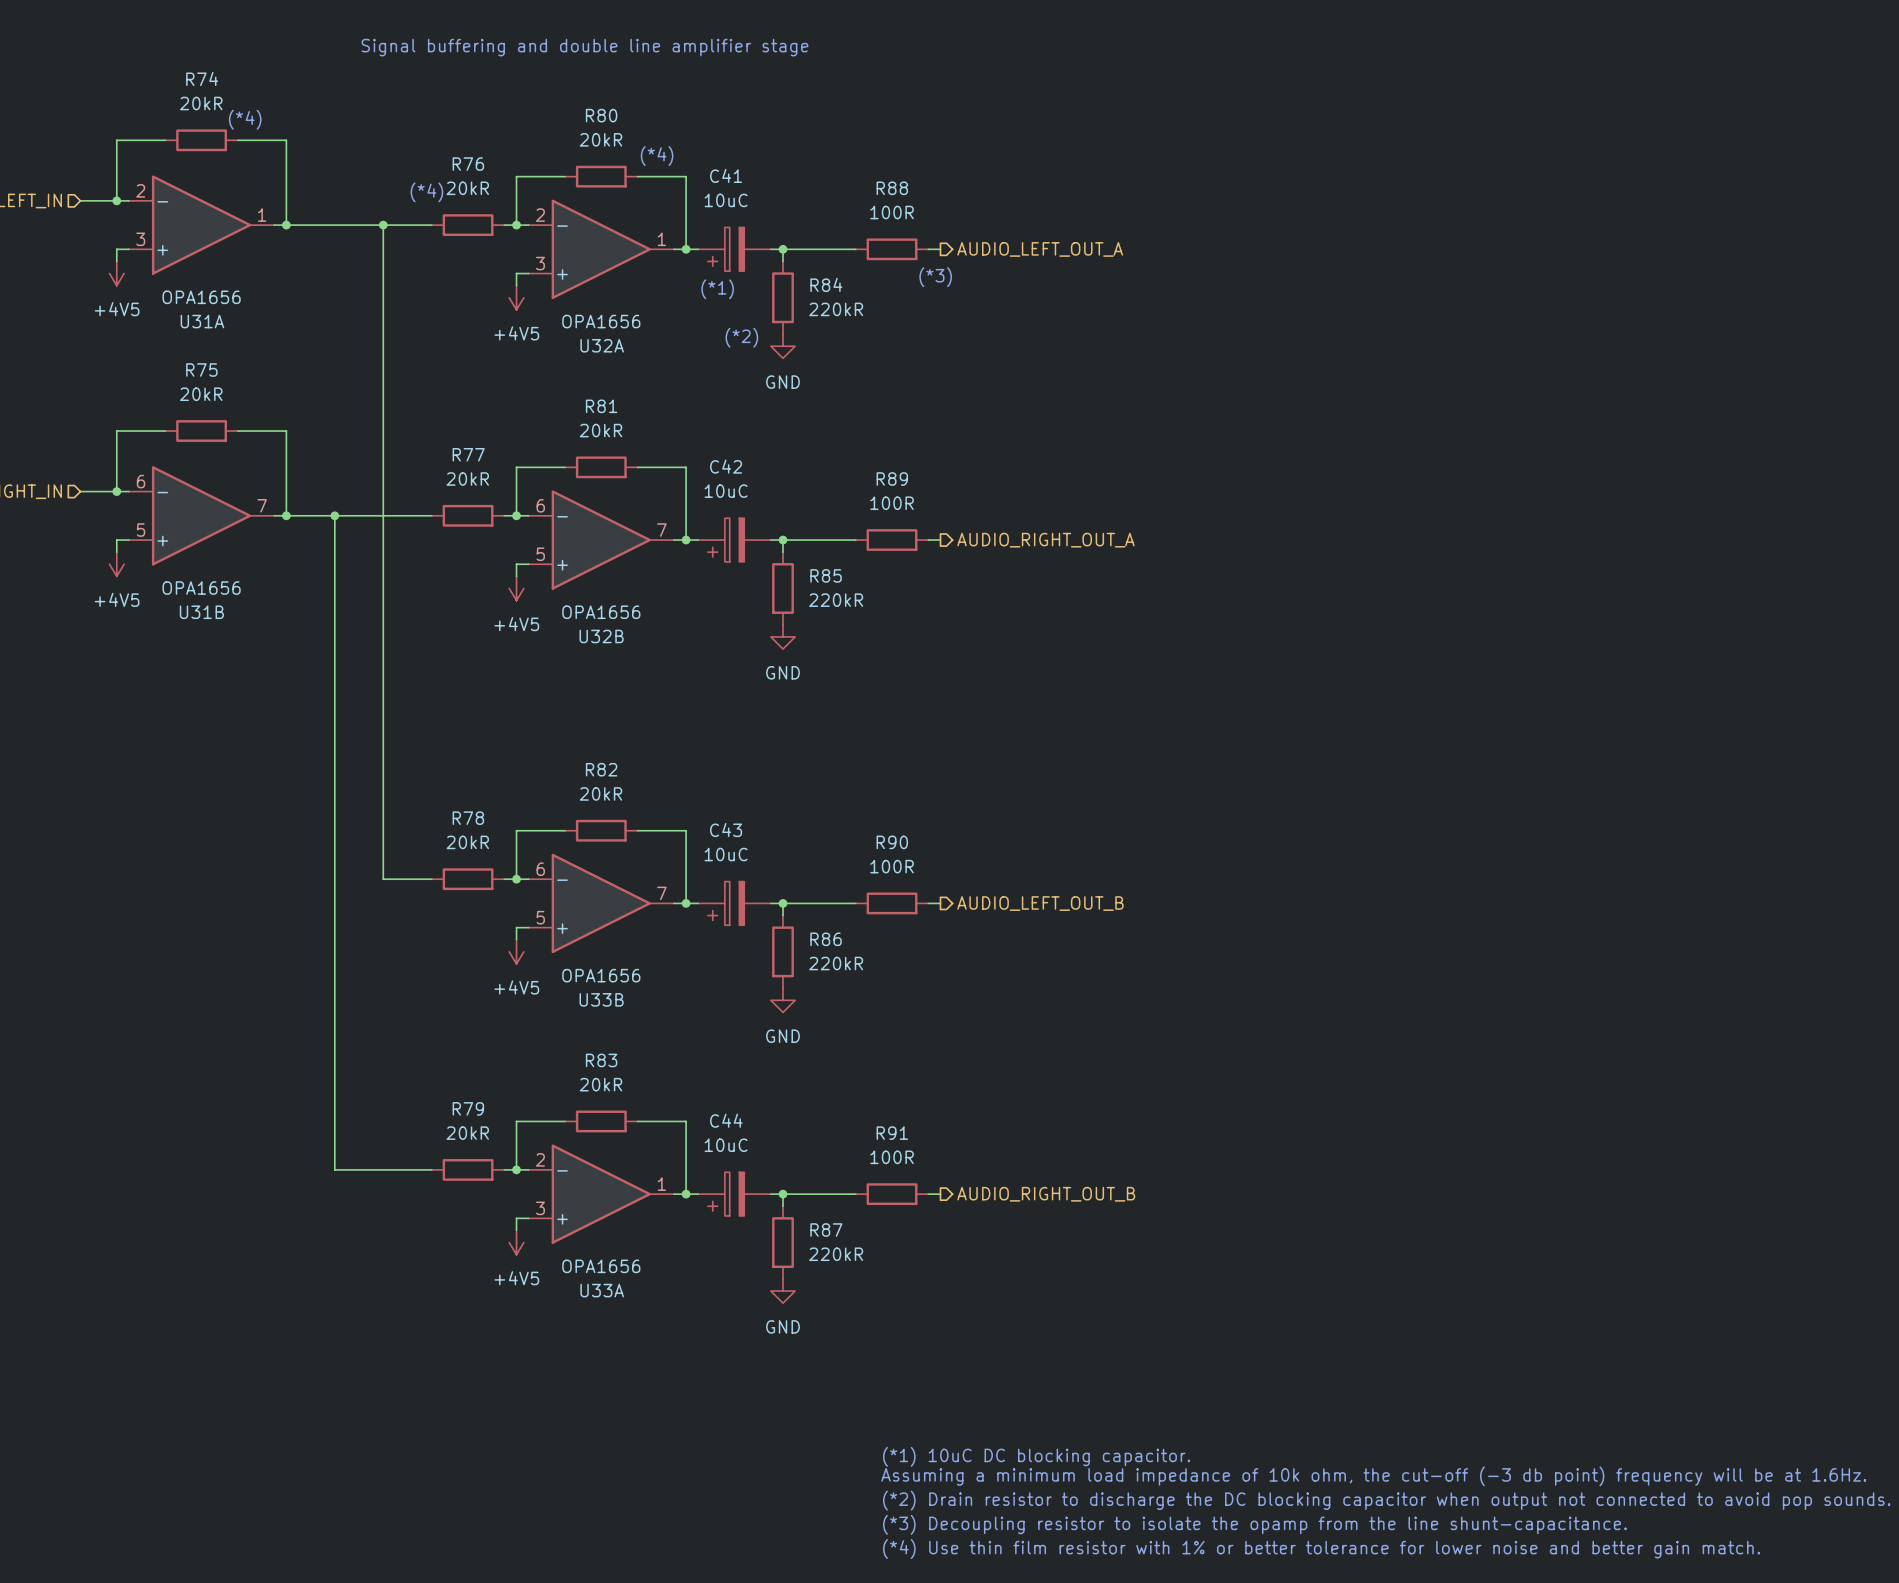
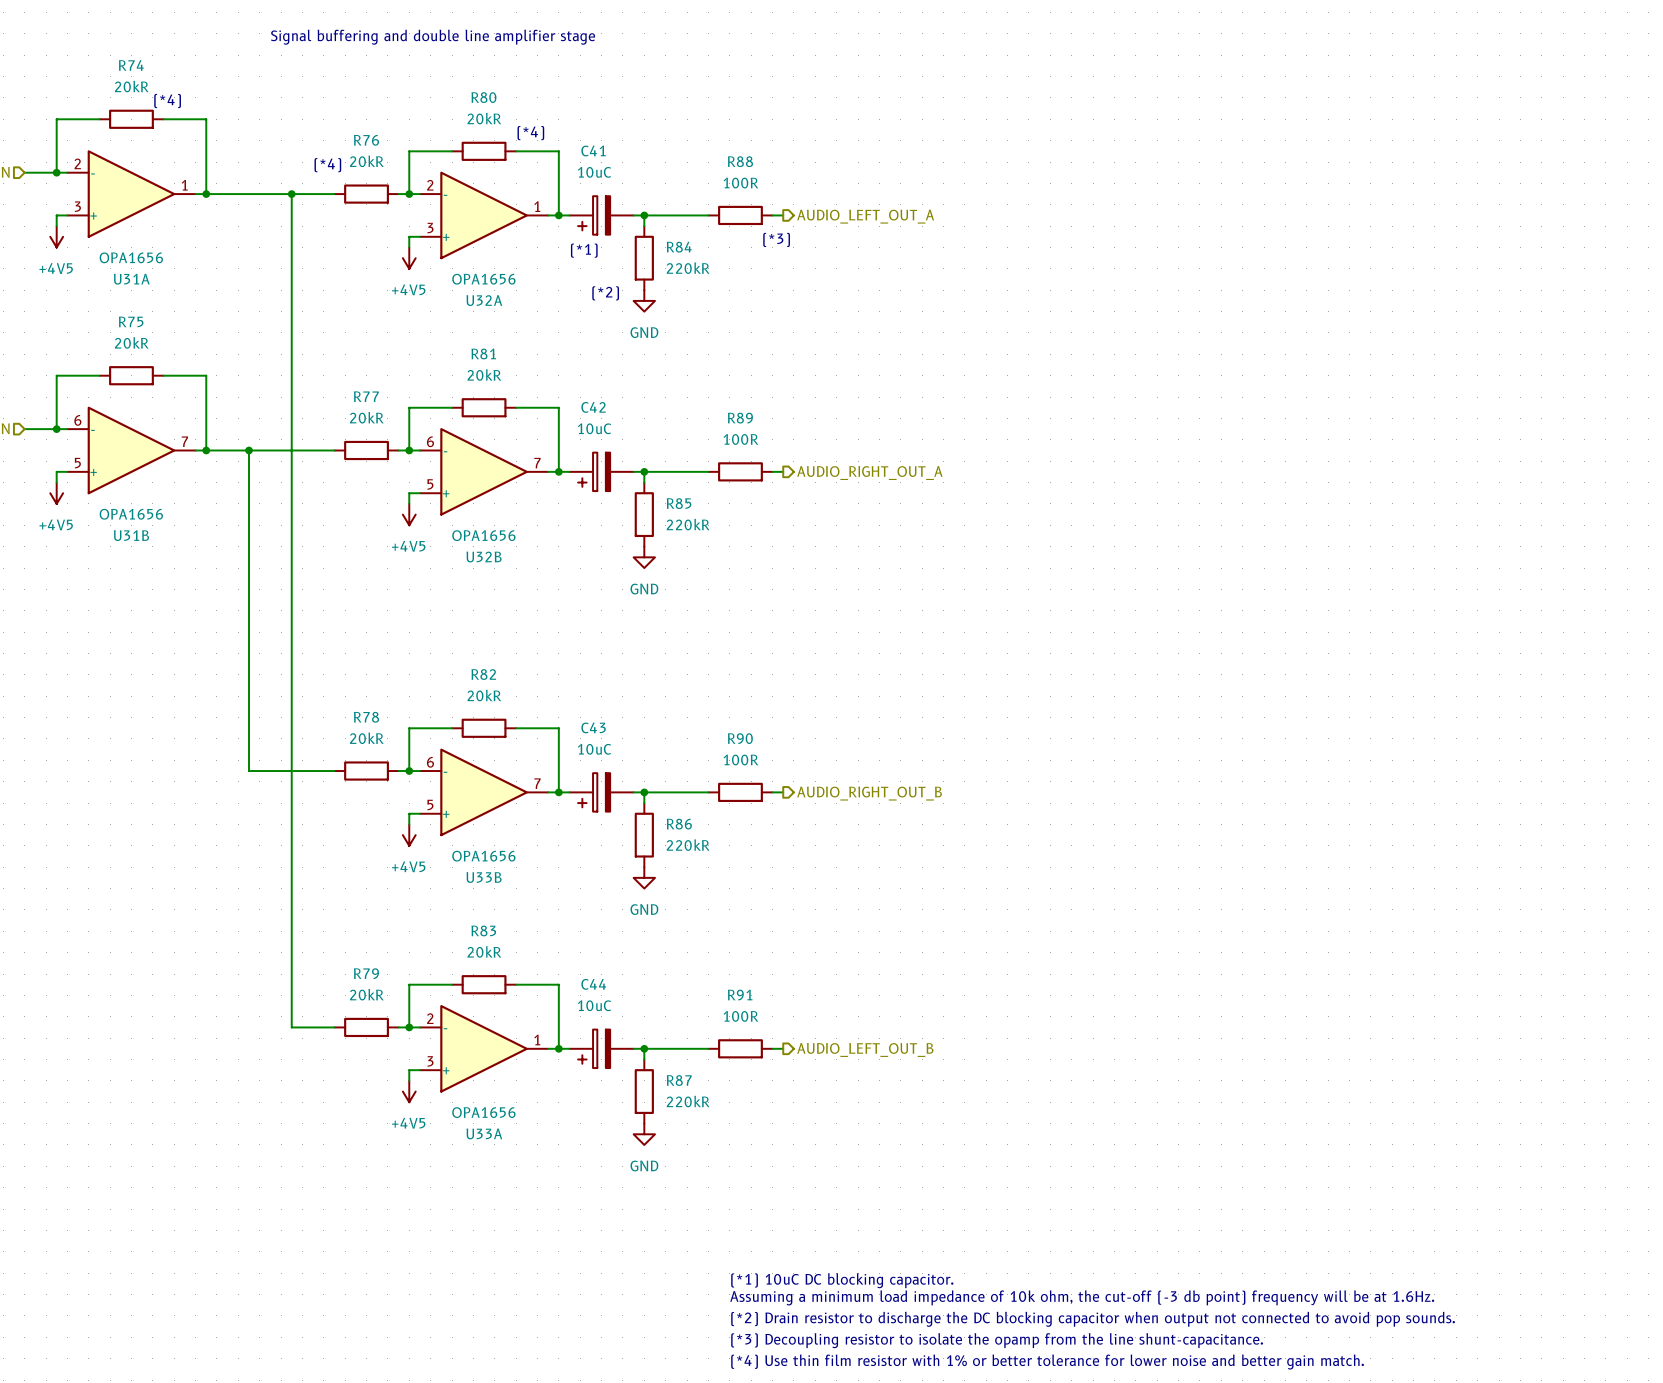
wire: (334, 879) (334, 1169) (383, 1169) -> (249, 771) (291, 771) (291, 1027)
hierarchical label: AUDIO_LEFT_OUT_B (1040, 903) -> AUDIO_RIGHT_OUT_B (869, 793)
hierarchical label: AUDIO_RIGHT_OUT_B (1046, 1194) -> AUDIO_LEFT_OUT_B (865, 1050)

